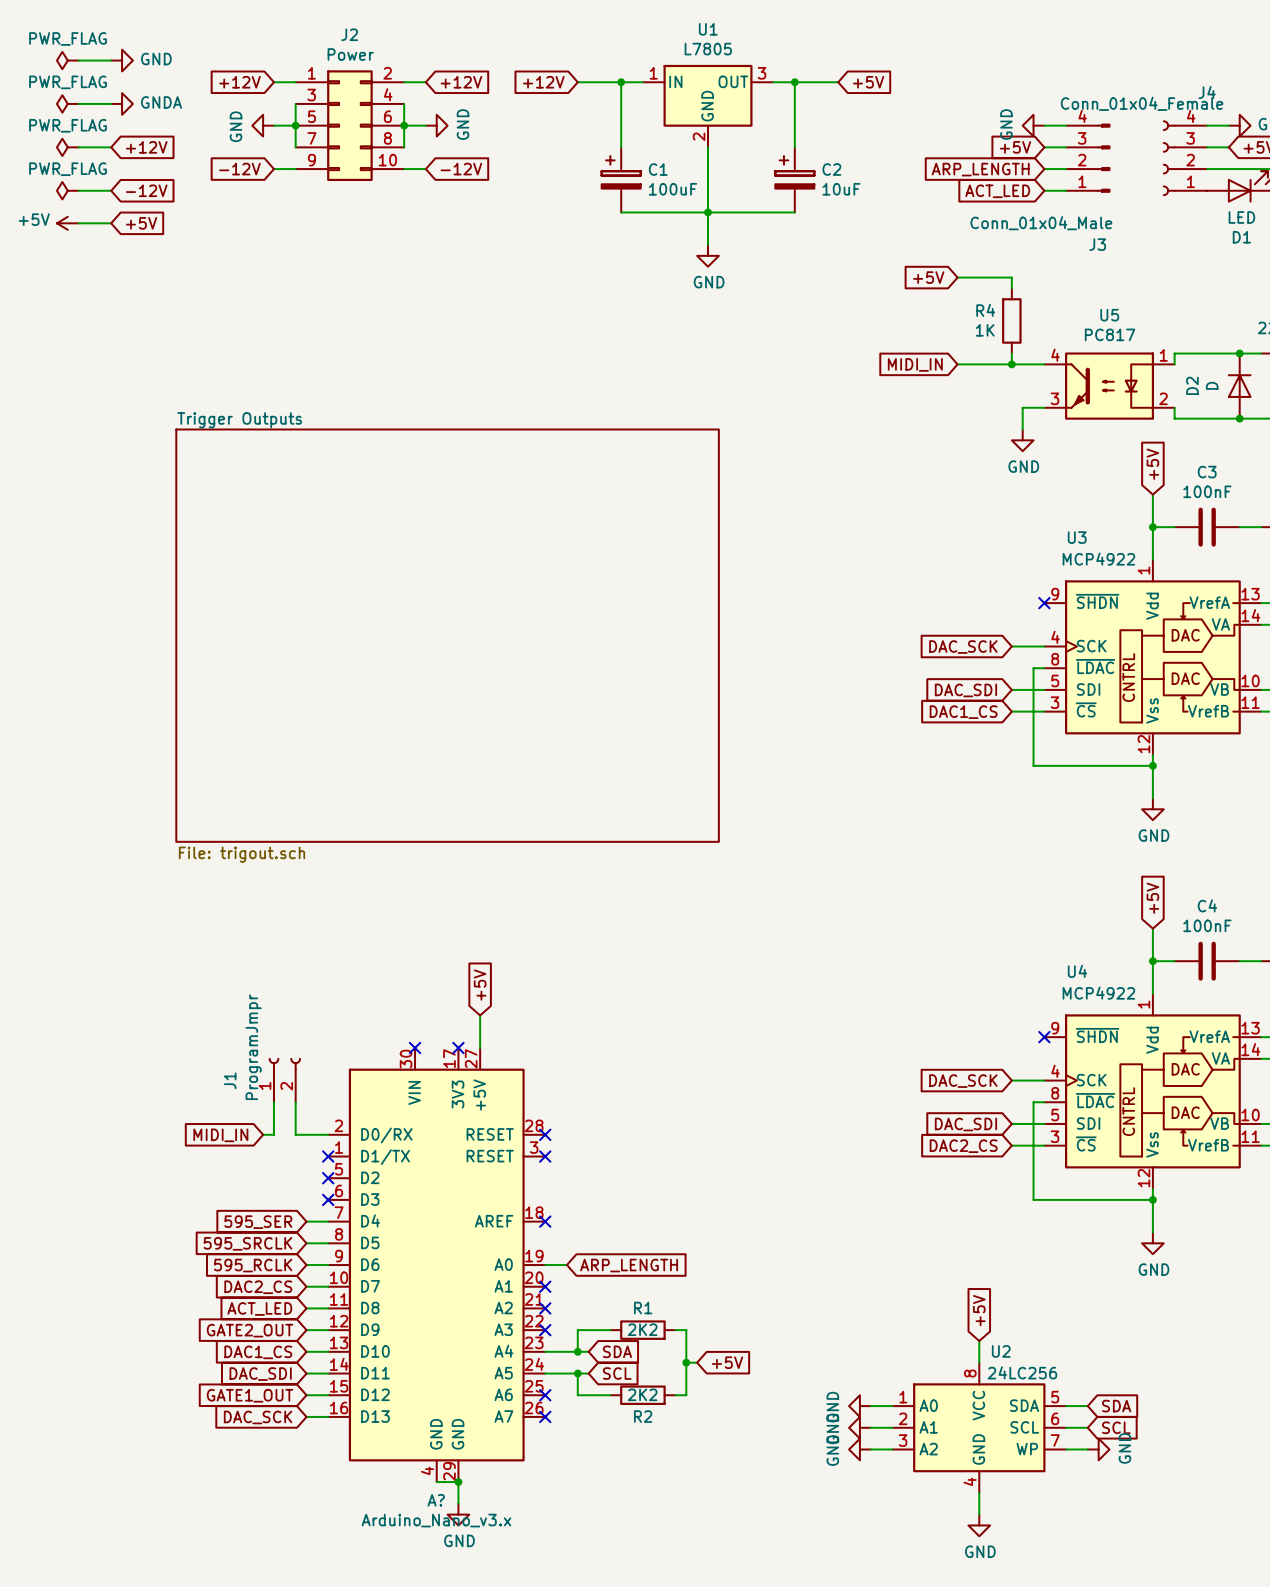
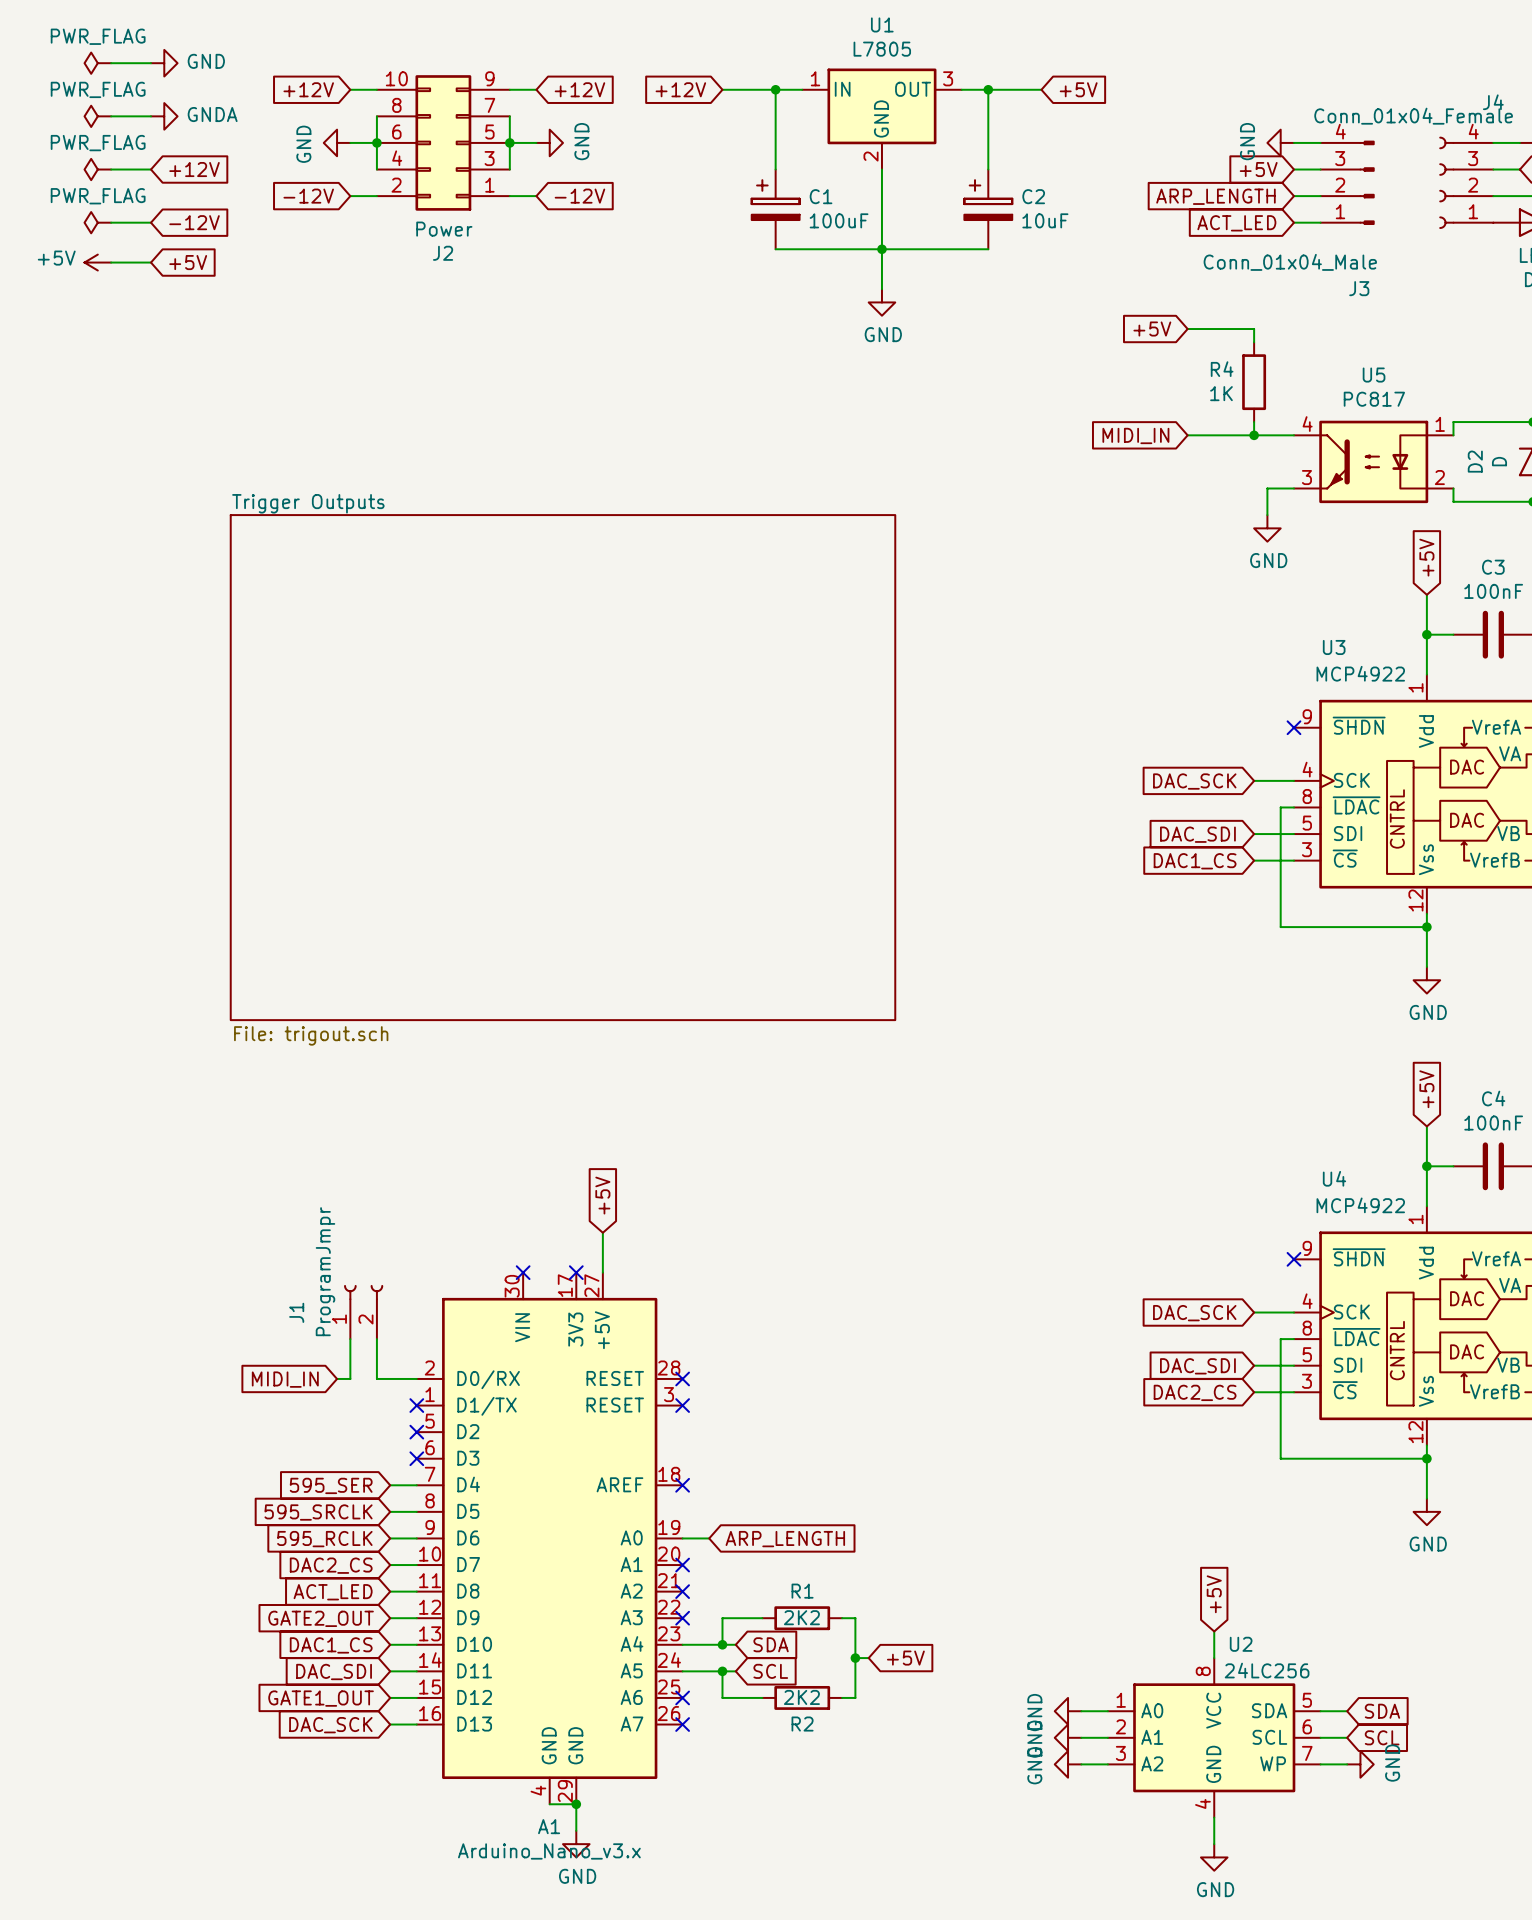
J2 rotation: 0° (349, 125) -> 180° (443, 142)
A? name: A? (436, 1500) -> A1 (549, 1826)

